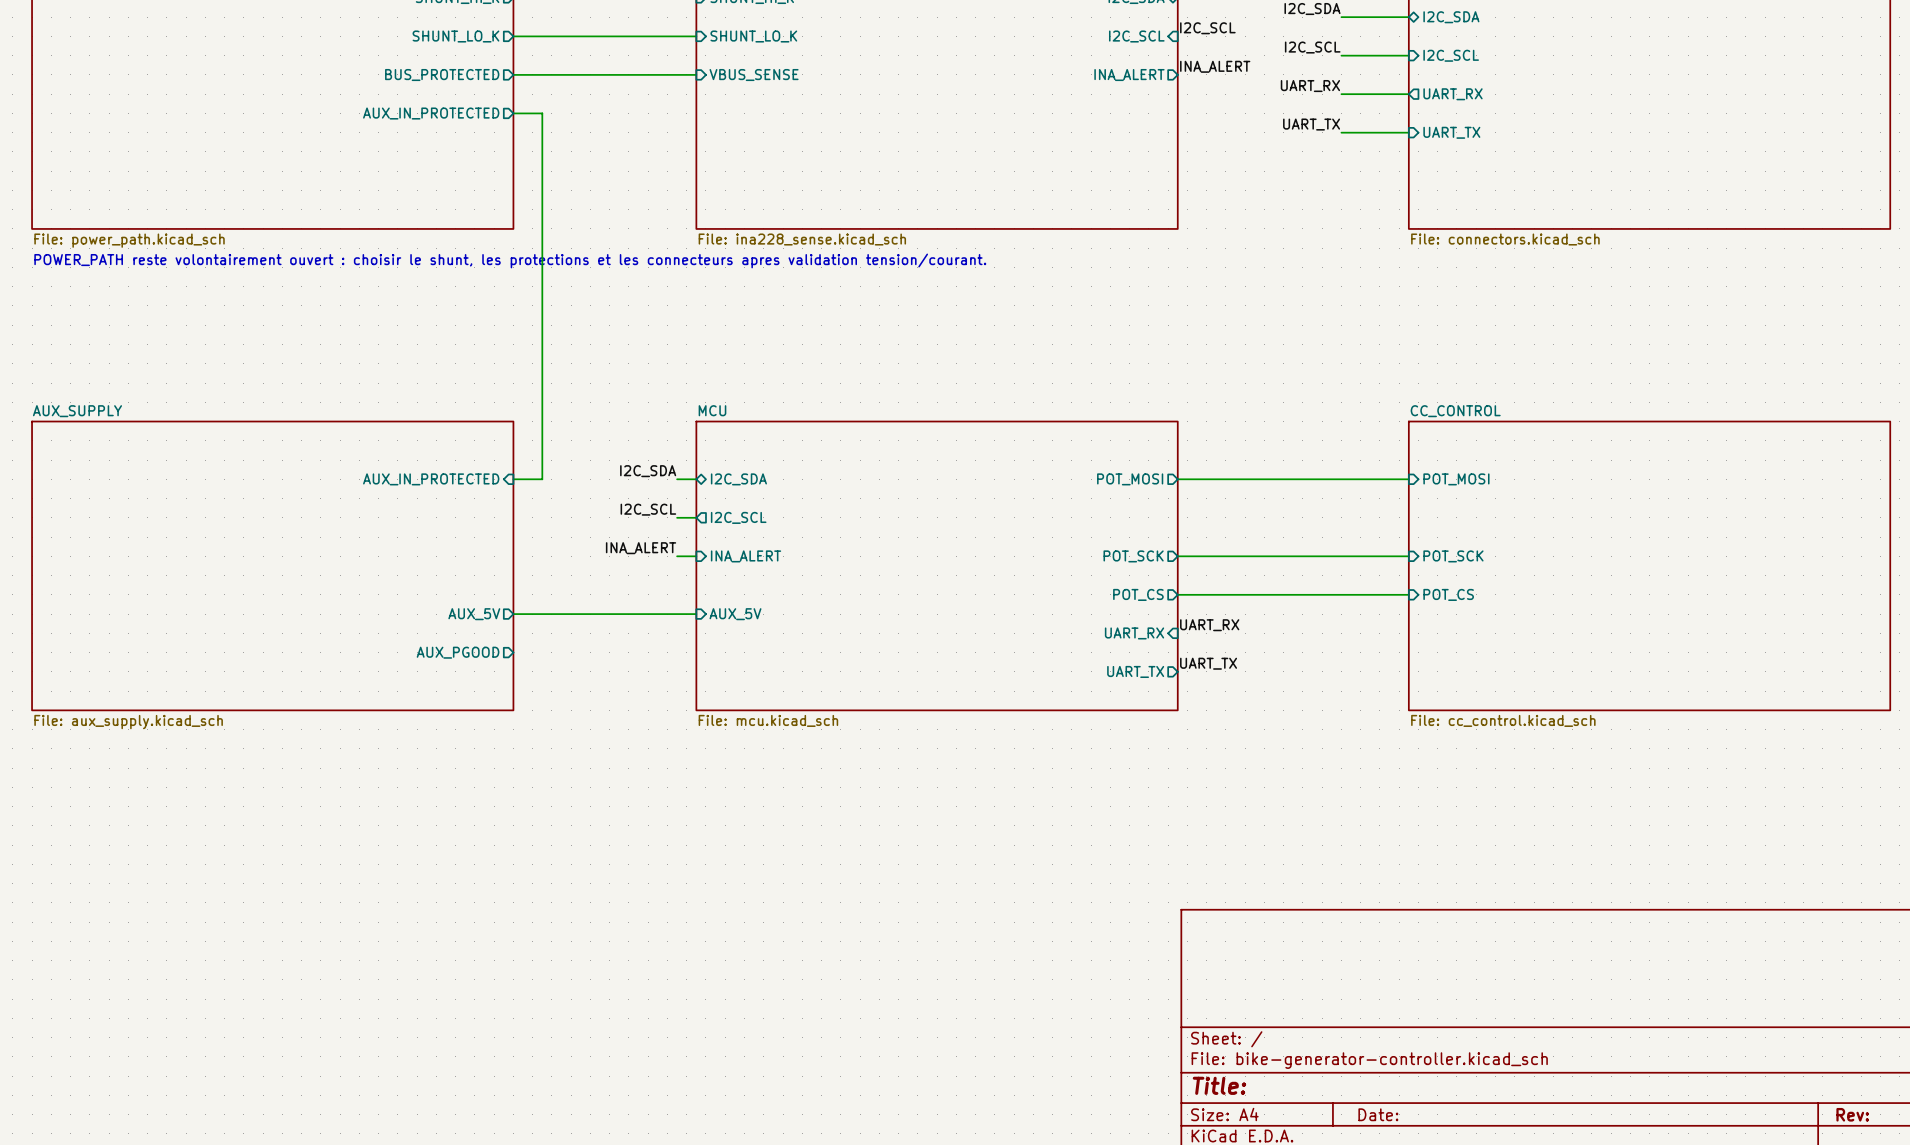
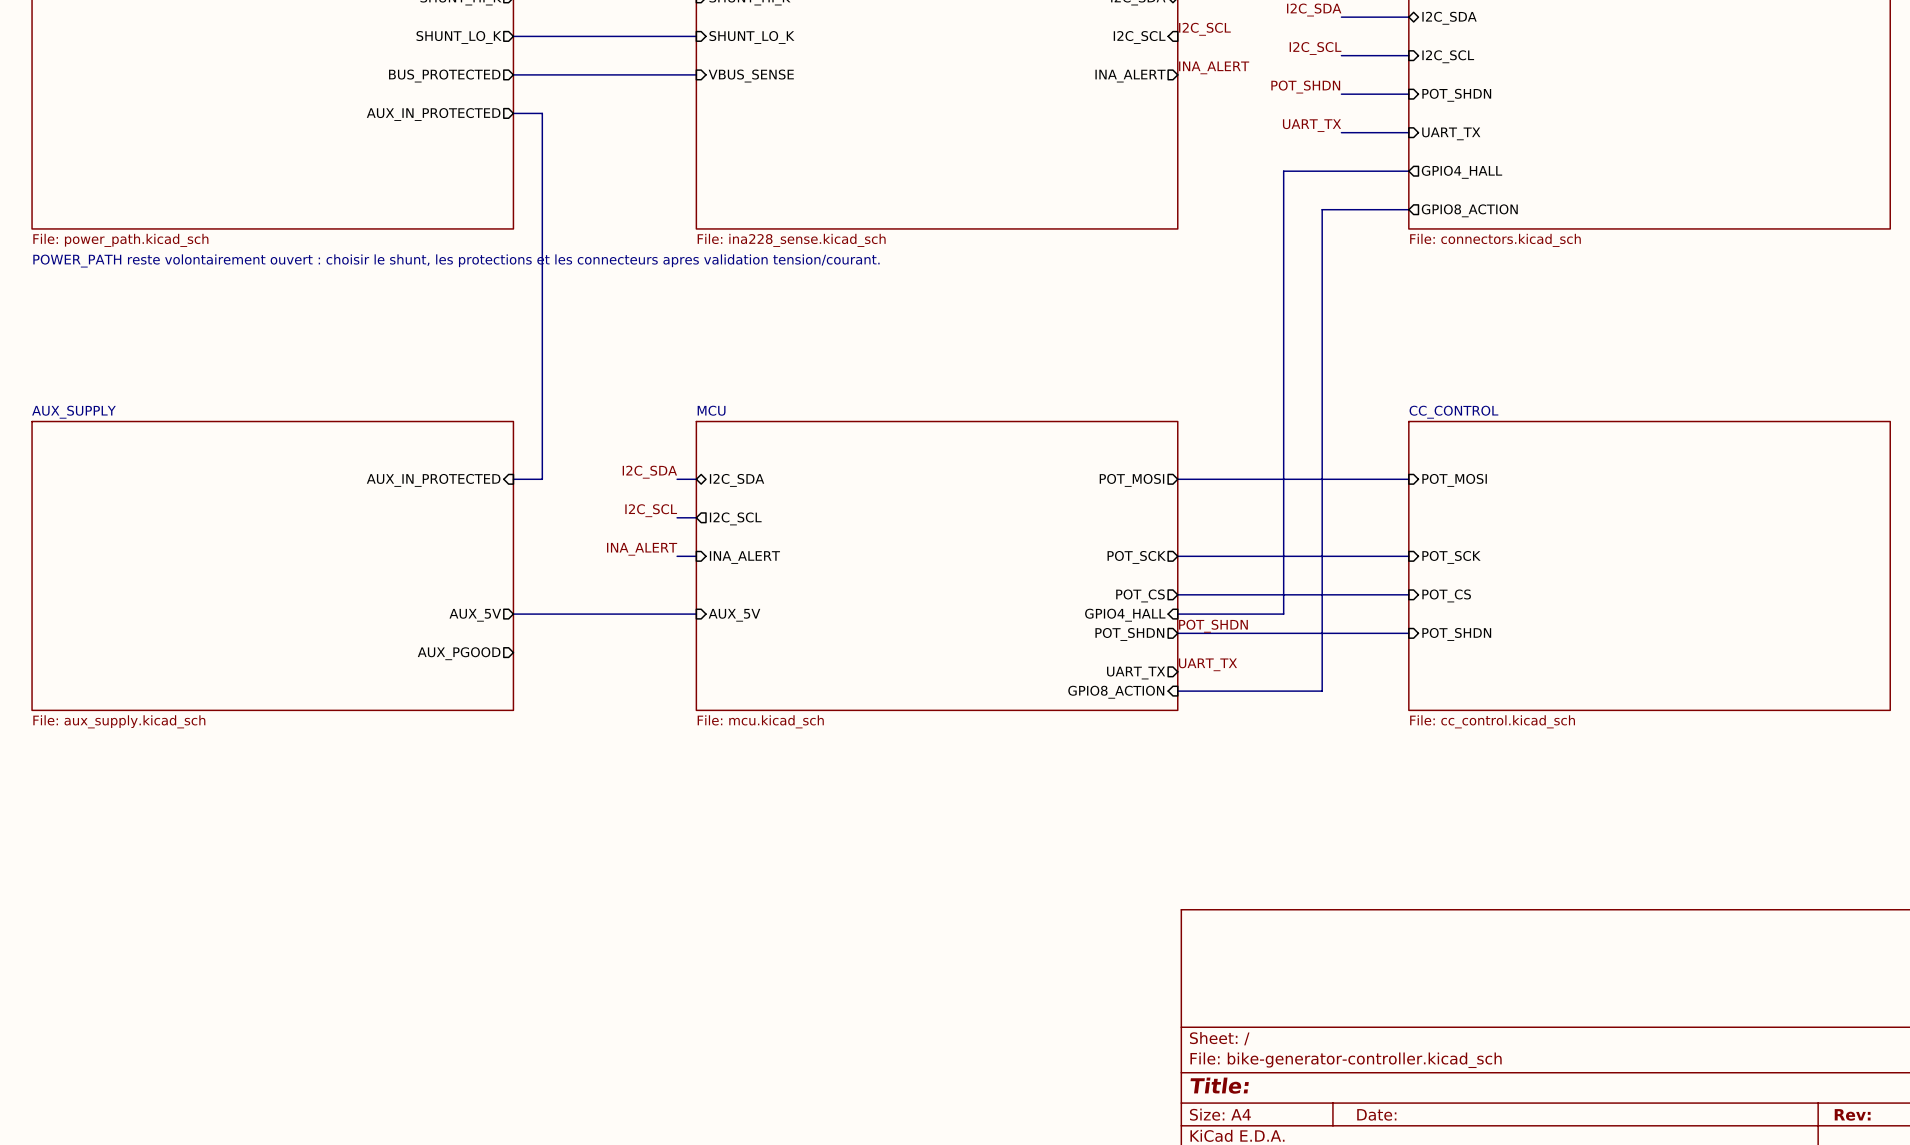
label: UART_RX (1310, 86) -> POT_SHDN (1305, 87)
sheet pin shape: output (1453, 94) -> input (1456, 95)
sheet pin: UART_RX (1453, 94) -> POT_SHDN (1456, 95)
wire: none -> (1408, 171) (1283, 171) (1283, 614) (1177, 614)
sheet pin: none -> GPIO4_HALL (1461, 172)
wire: none -> (1408, 209) (1322, 209) (1322, 691) (1177, 691)
sheet pin: none -> GPIO8_ACTION (1469, 210)
sheet pin: none -> GPIO4_HALL (1125, 615)
label: UART_RX (1209, 625) -> POT_SHDN (1213, 626)
sheet pin shape: input (1134, 633) -> output (1129, 634)
sheet pin: UART_RX (1134, 633) -> POT_SHDN (1129, 634)
wire: none -> (1177, 633) (1408, 633)
sheet pin: none -> POT_SHDN (1456, 634)
sheet pin: none -> GPIO8_ACTION (1116, 692)

